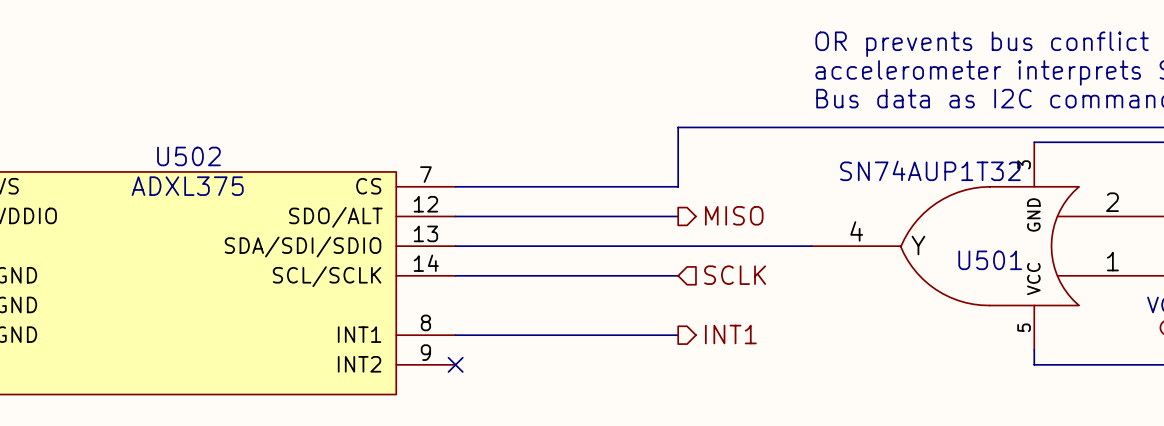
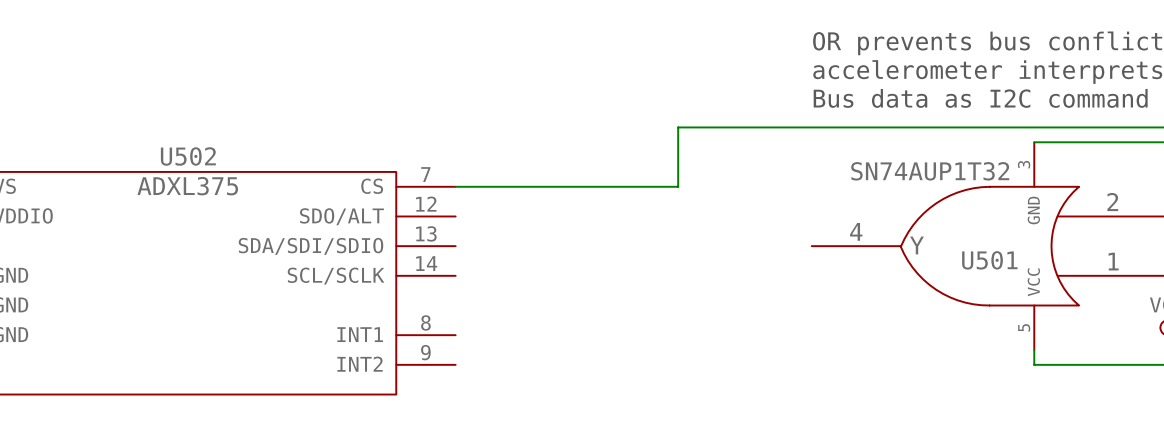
hierarchical label: MISO (734, 215) -> none
wire: (455, 216) (678, 216) -> none
wire: (455, 246) (811, 246) -> none
wire: (455, 275) (678, 275) -> none
hierarchical label: SCLK (735, 275) -> none
hierarchical label: INT1 (730, 334) -> none
wire: (455, 335) (678, 335) -> none
no-connect mark: (455, 364) -> none

